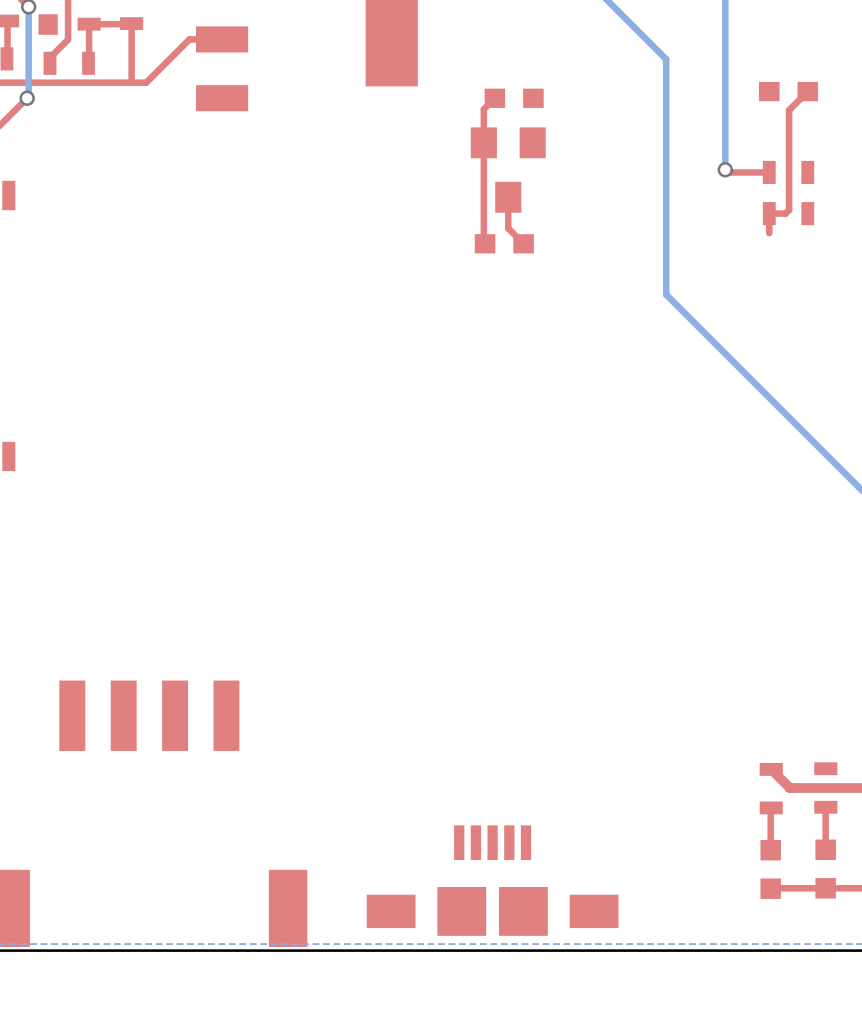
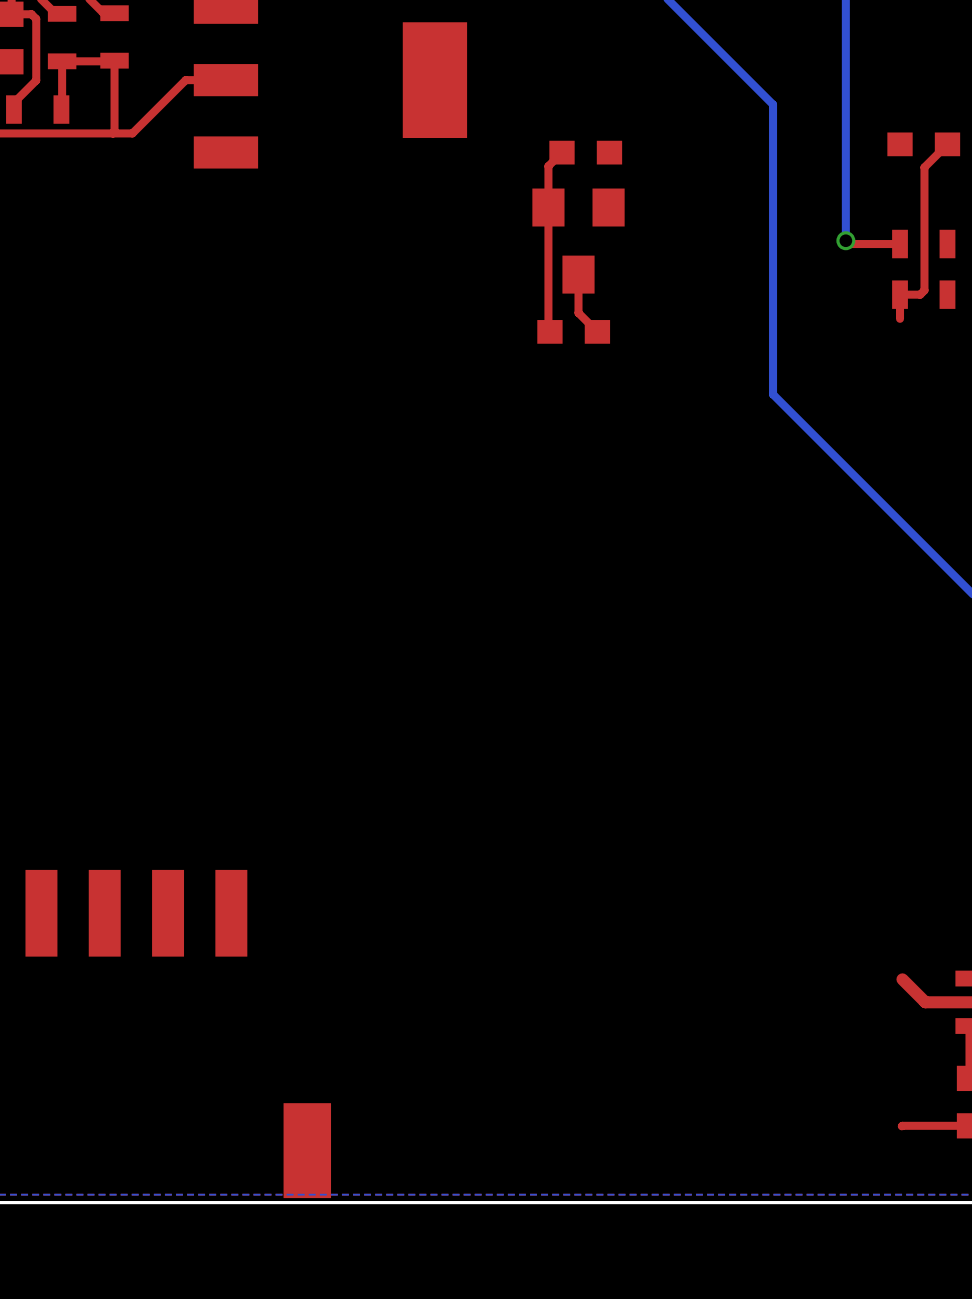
part: (771, 788) -> none
top track: (771, 807) (770, 850) -> none
part: (770, 869) -> none
part: (492, 880) -> none

